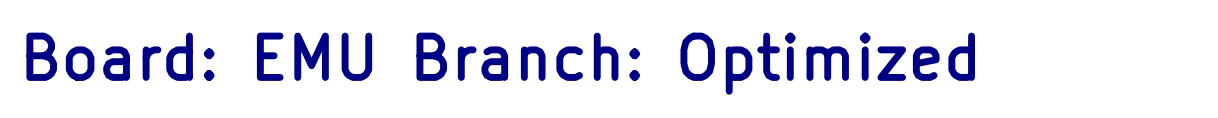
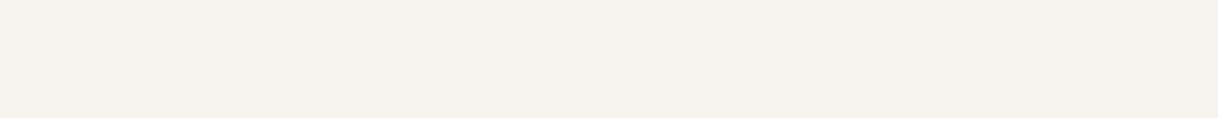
text: Board: EMU Branch: Optimized (500, 63) -> none

